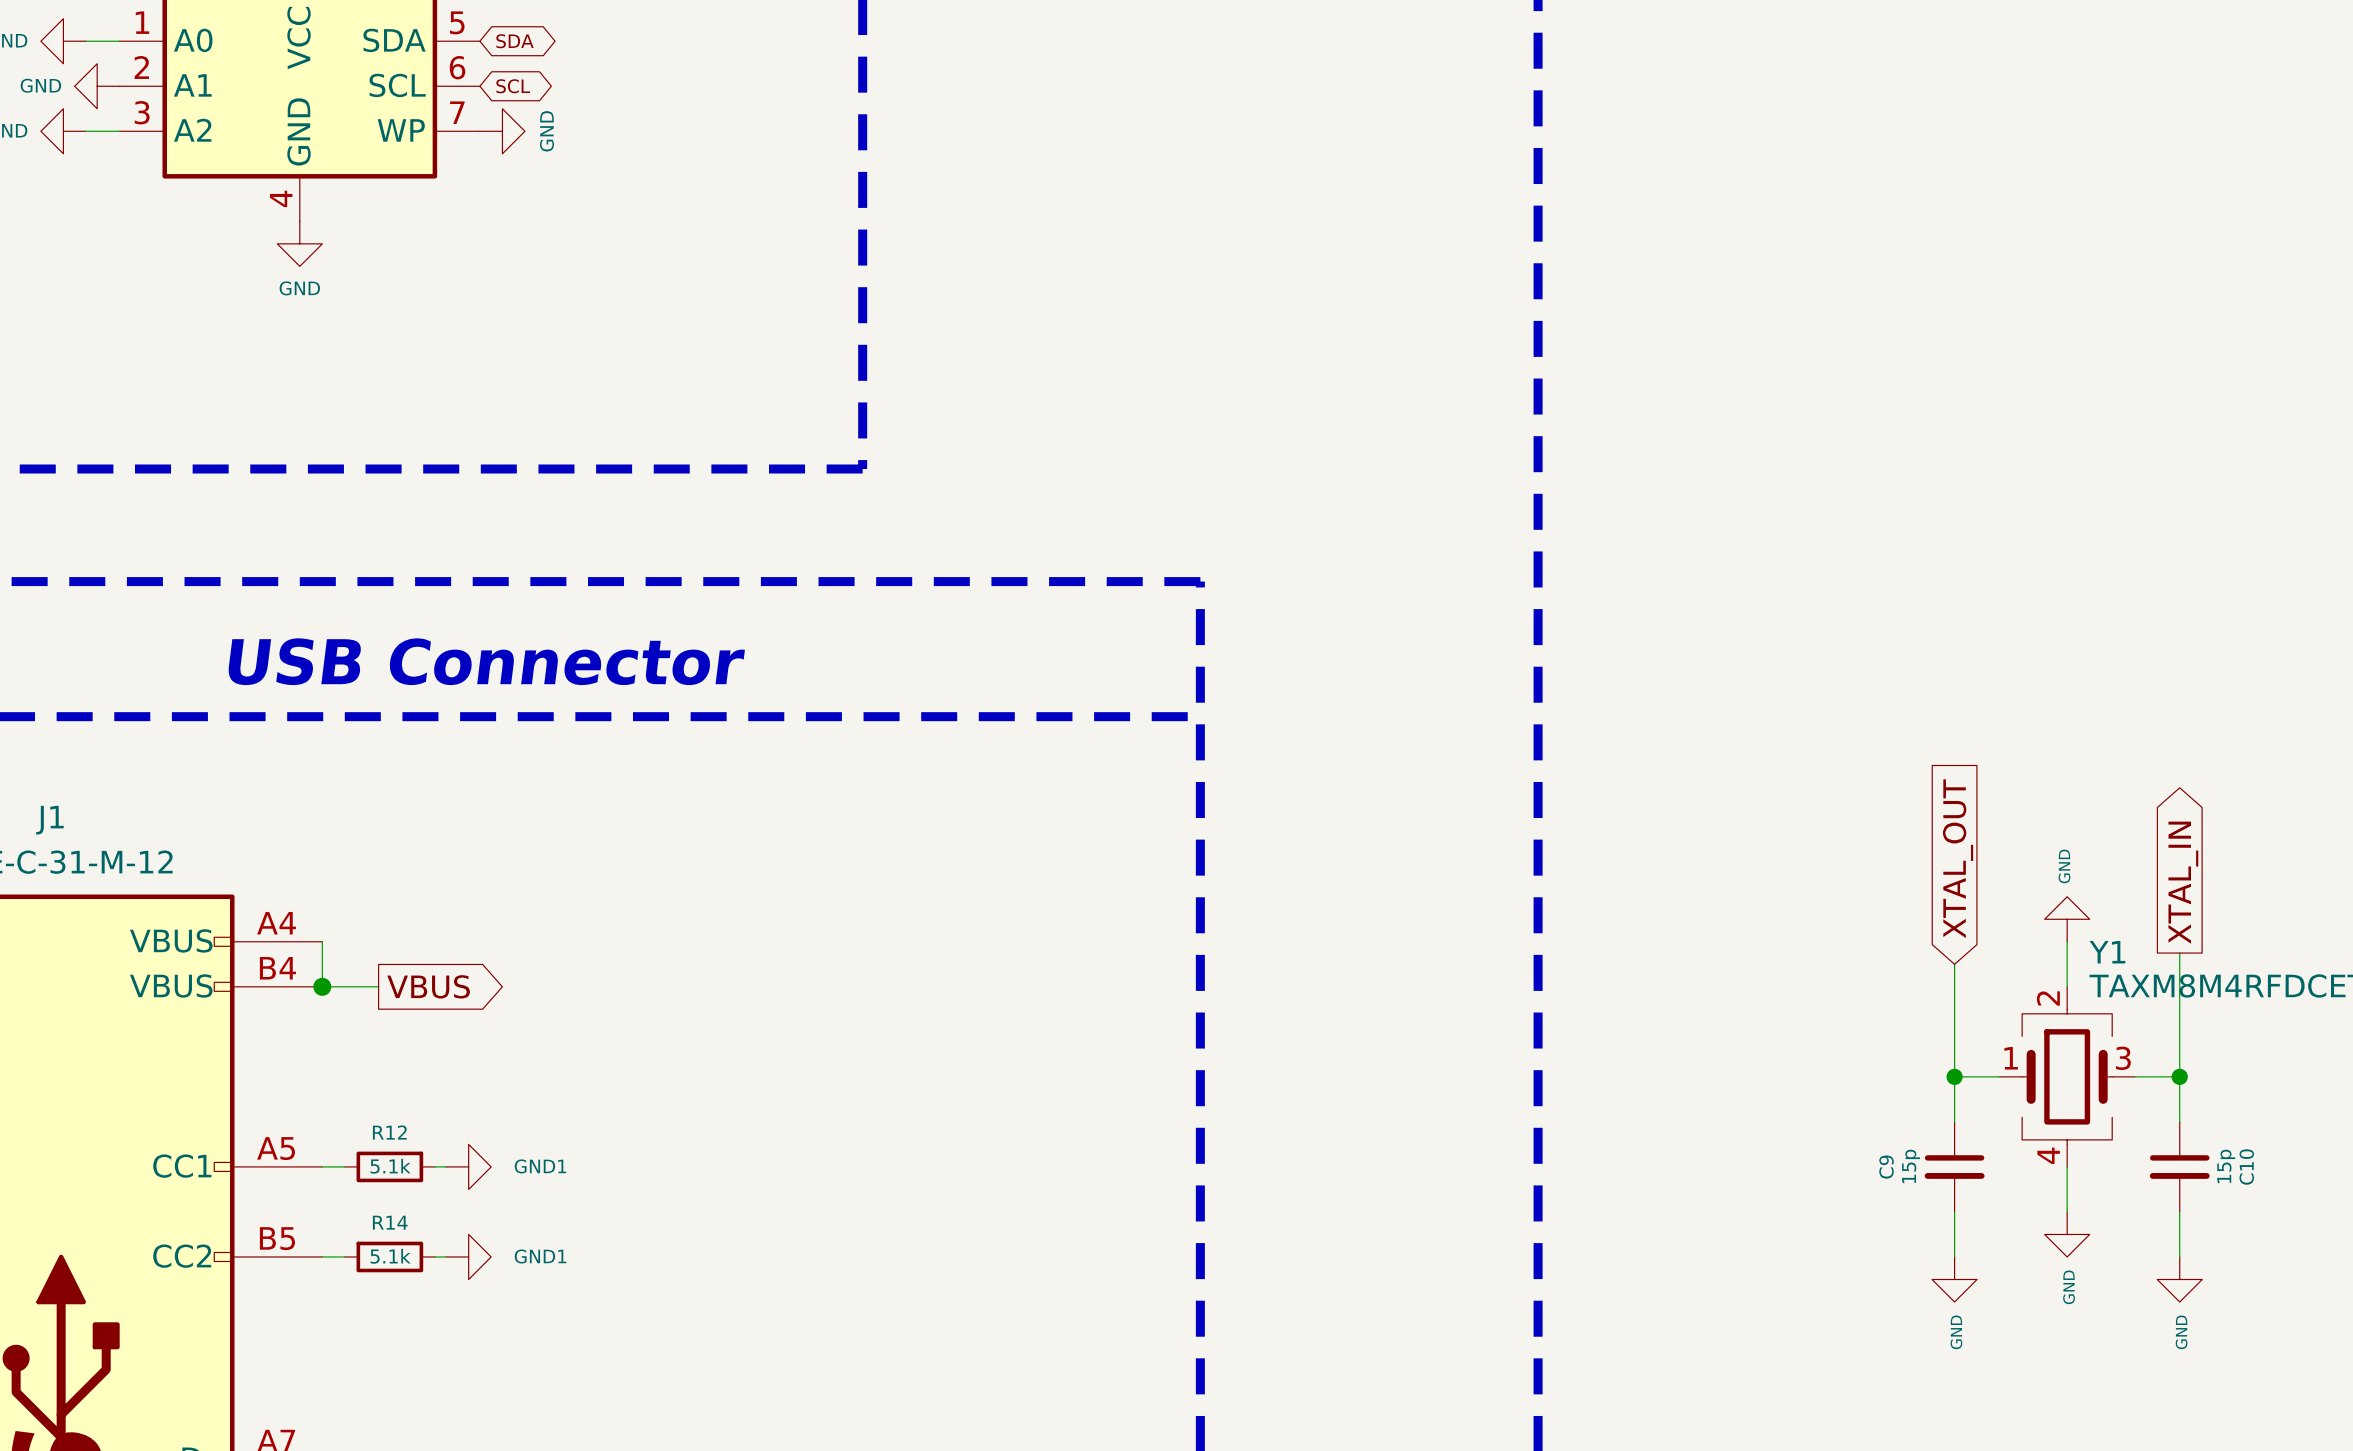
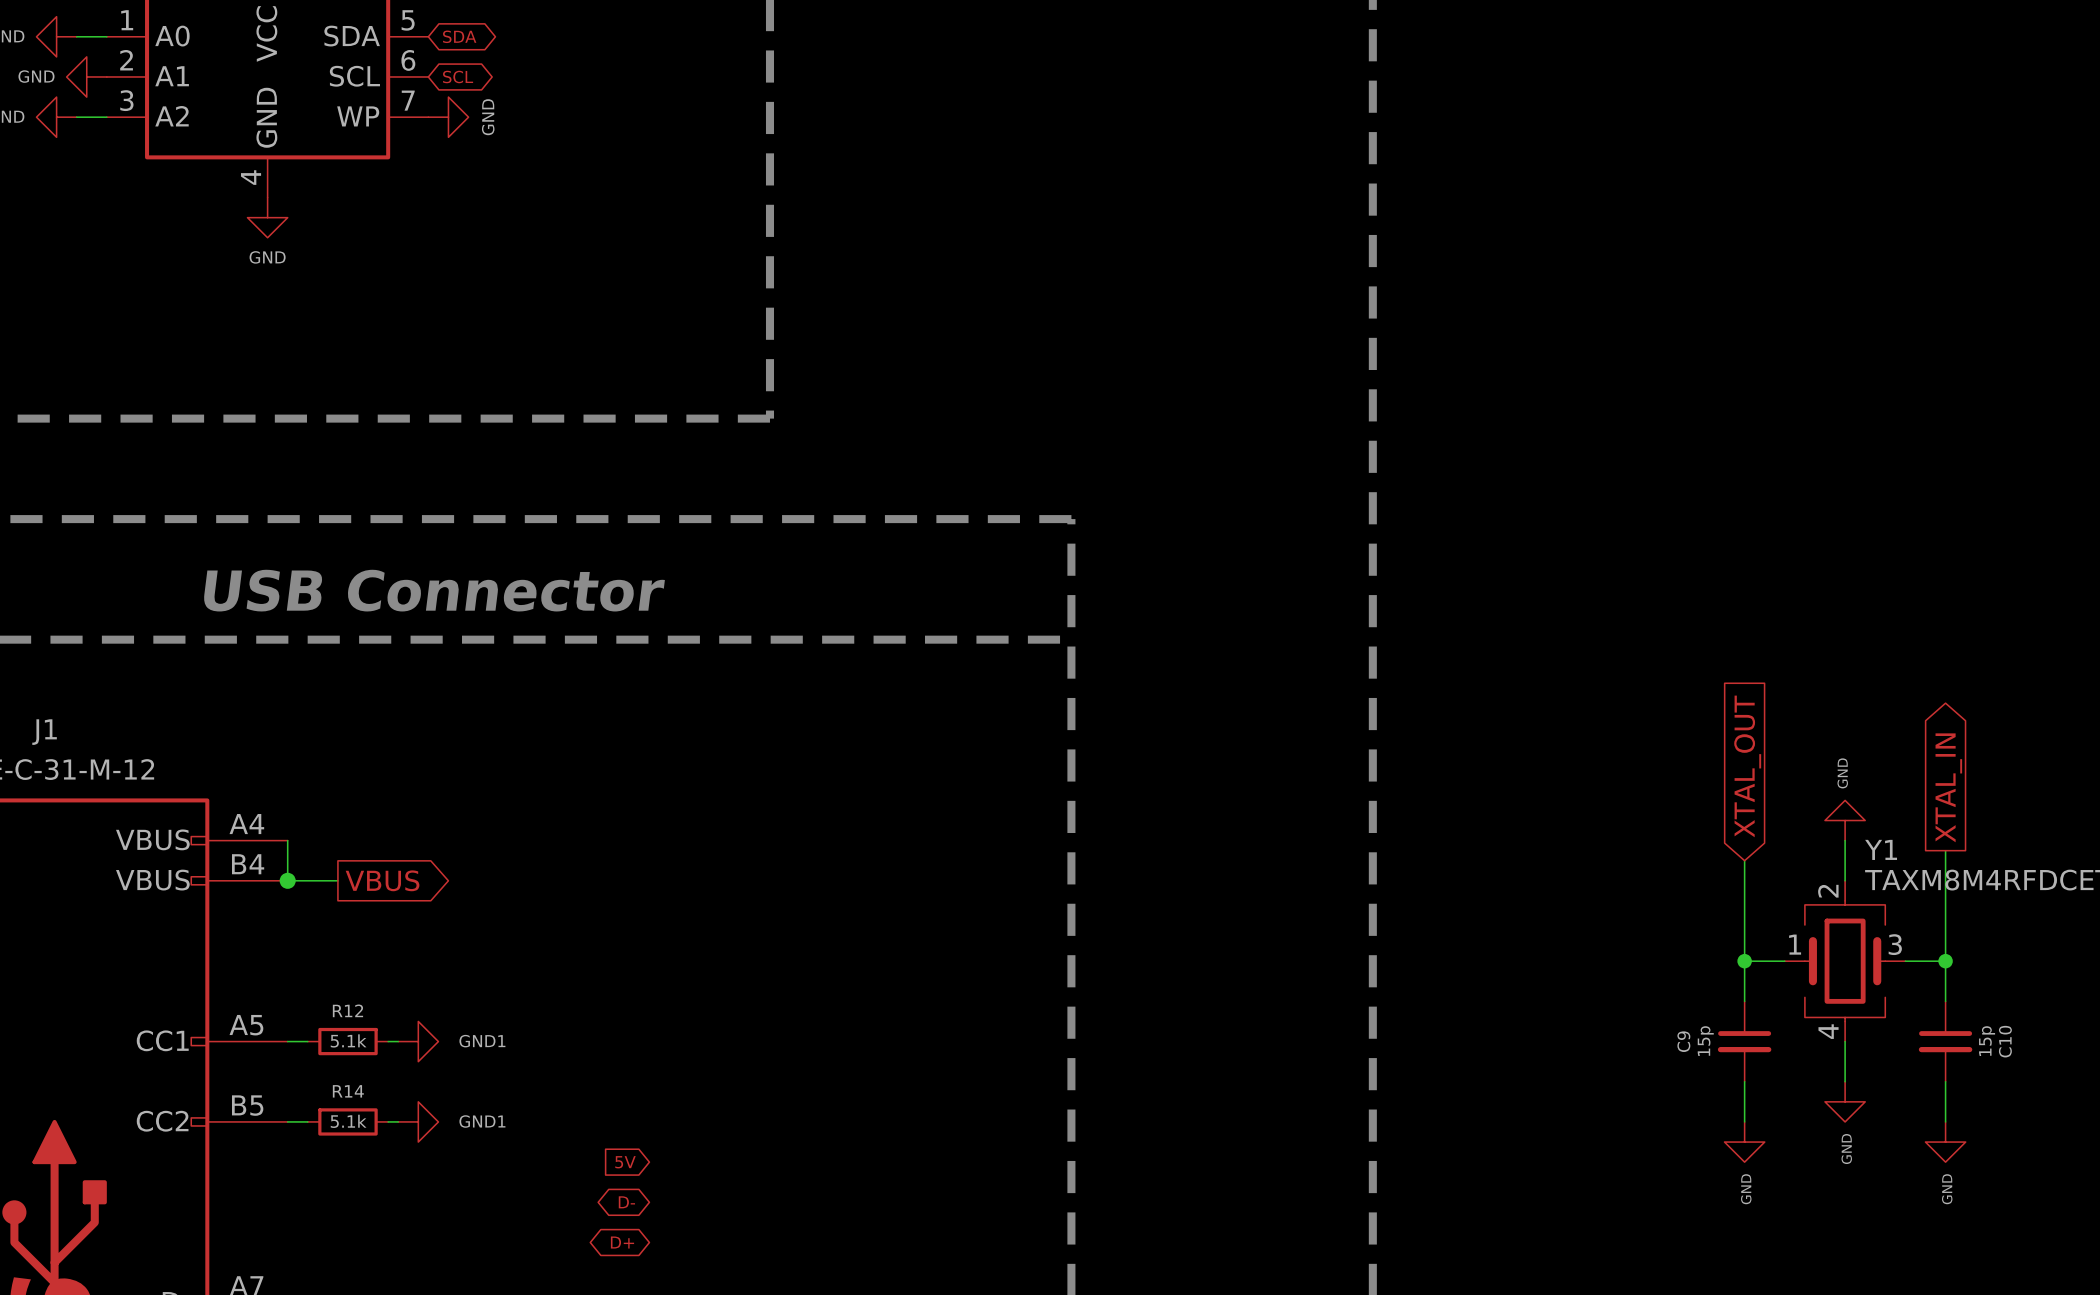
global label: none -> 5V (625, 1162)
global label: none -> D- (626, 1202)
global label: none -> D+ (622, 1242)

